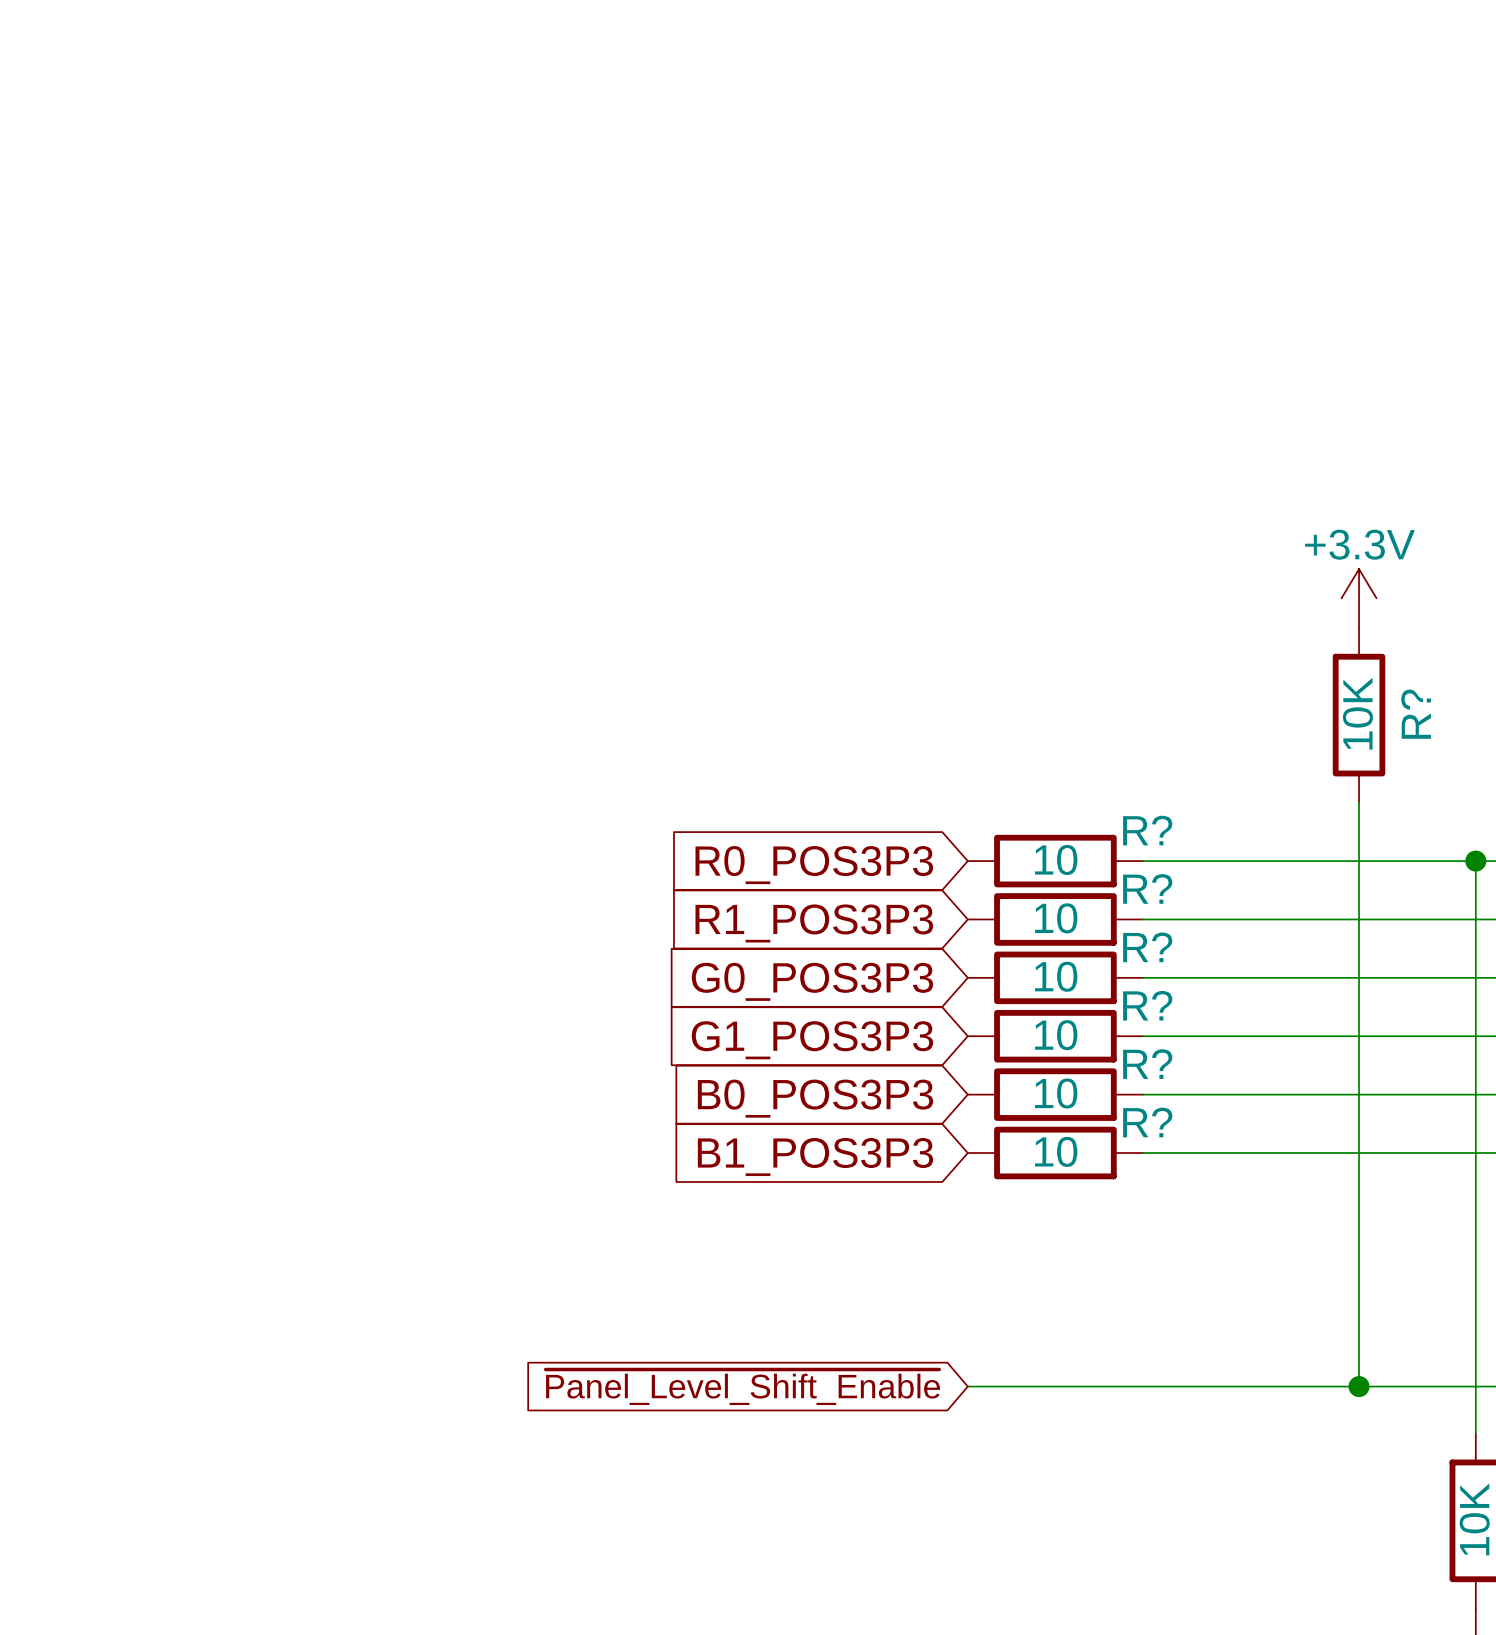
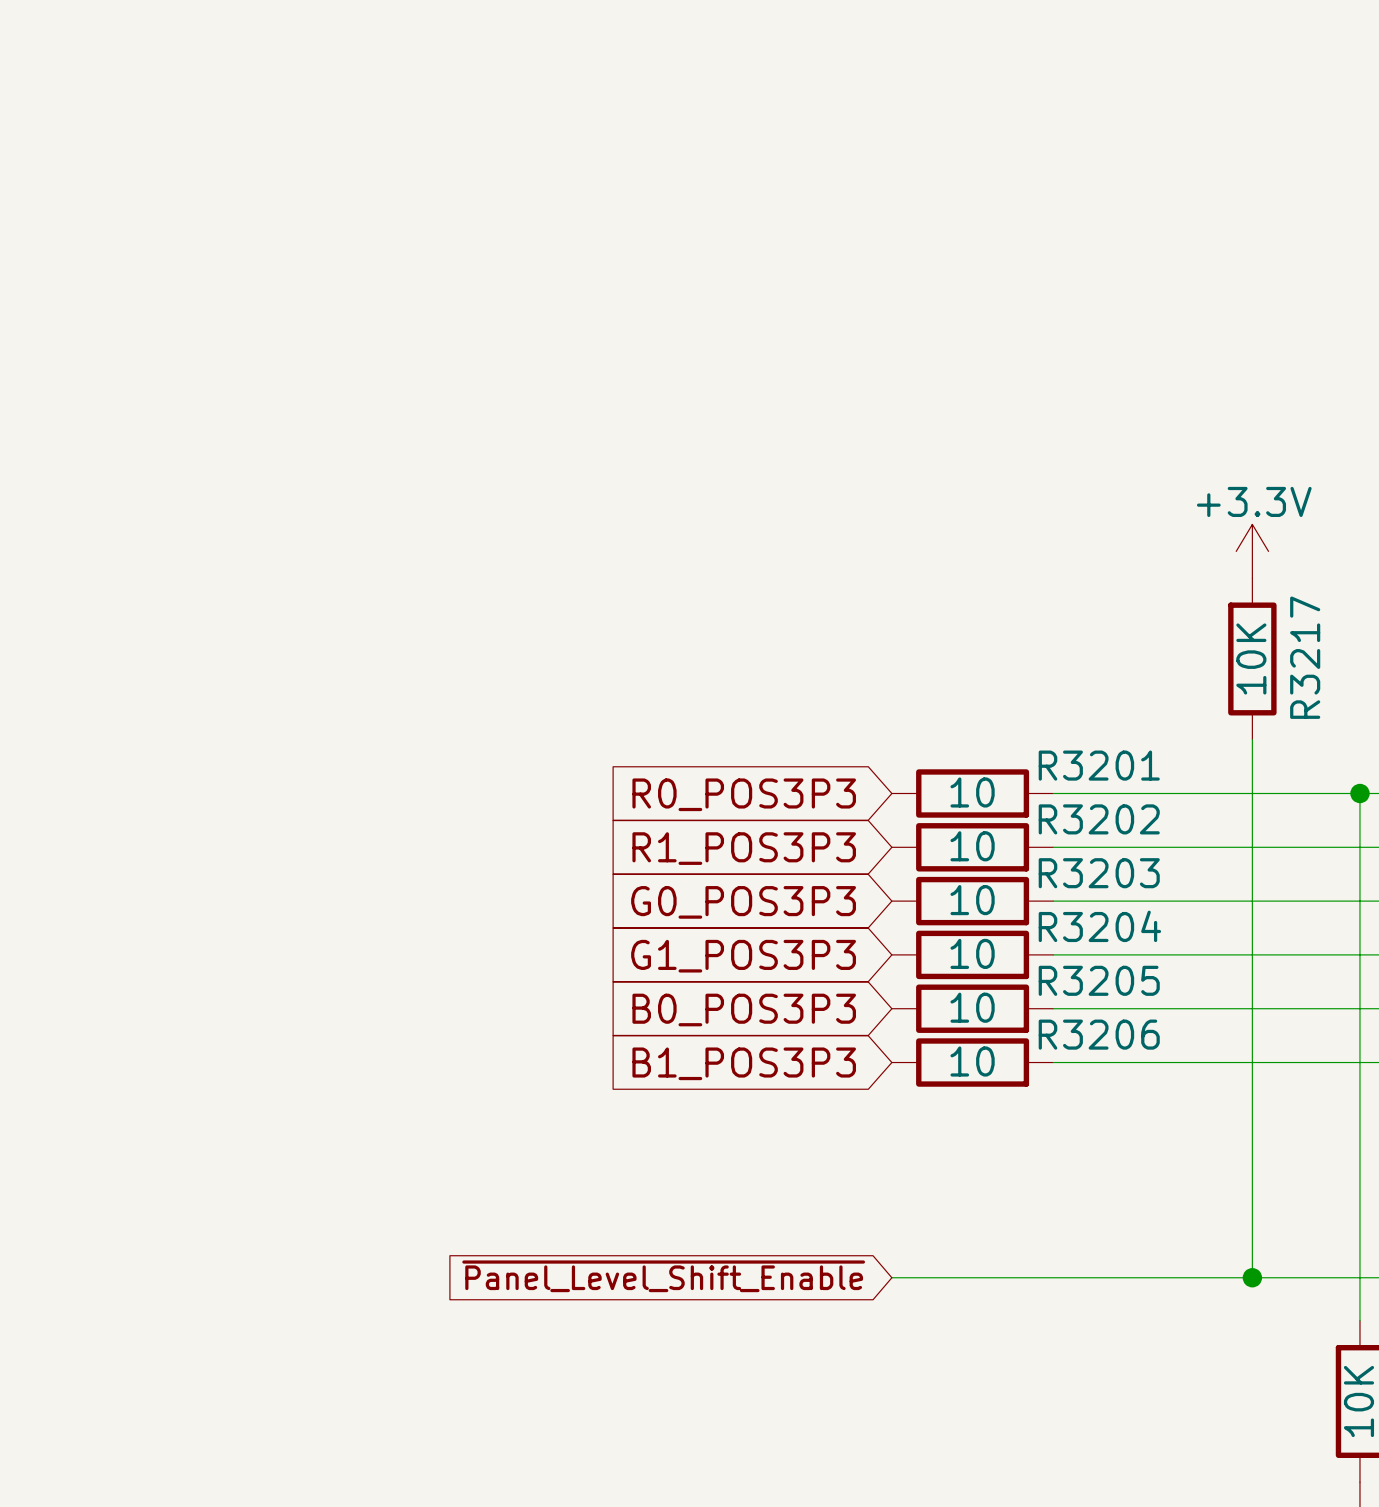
R? name: R? (1416, 714) -> R3217 (1305, 657)
R? name: R? (1147, 830) -> R3201 (1099, 765)
R? name: R? (1147, 888) -> R3202 (1099, 819)
R? name: R? (1147, 947) -> R3203 (1099, 873)
R? name: R? (1147, 1005) -> R3204 (1099, 926)
R? name: R? (1147, 1064) -> R3205 (1099, 980)
R? name: R? (1147, 1122) -> R3206 (1099, 1034)

